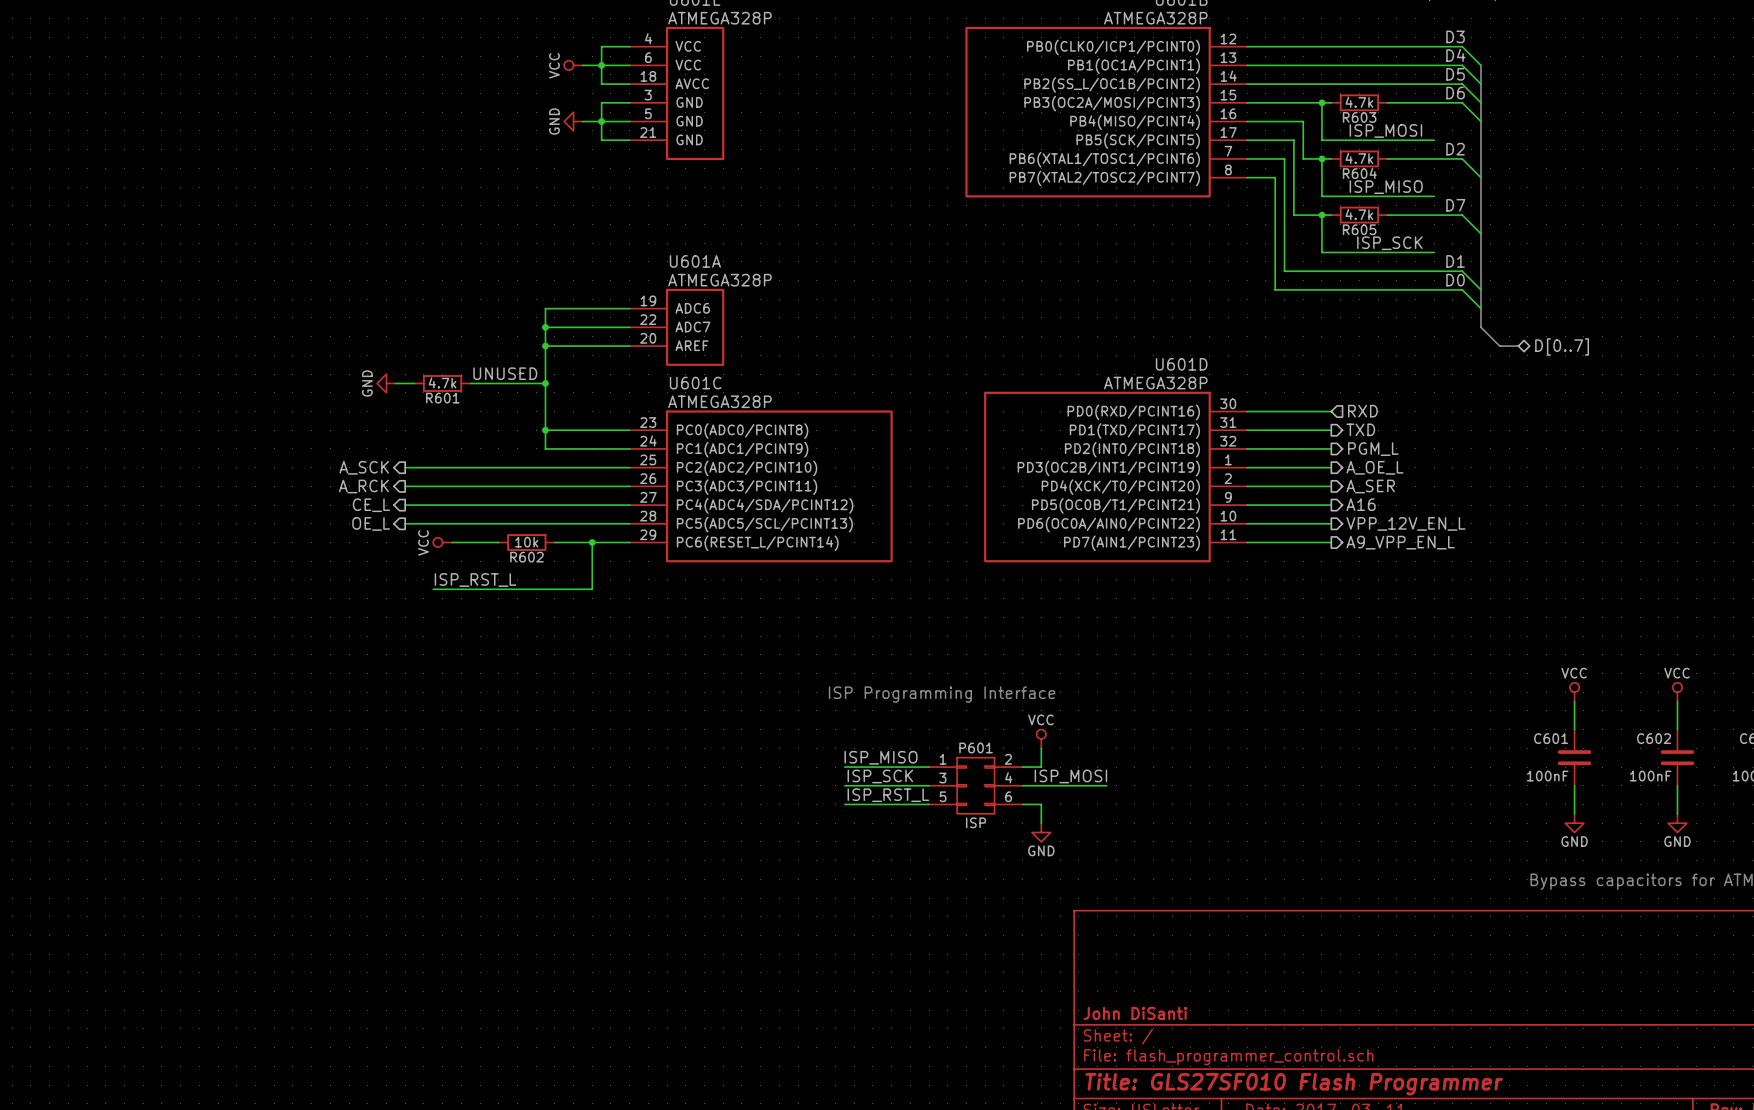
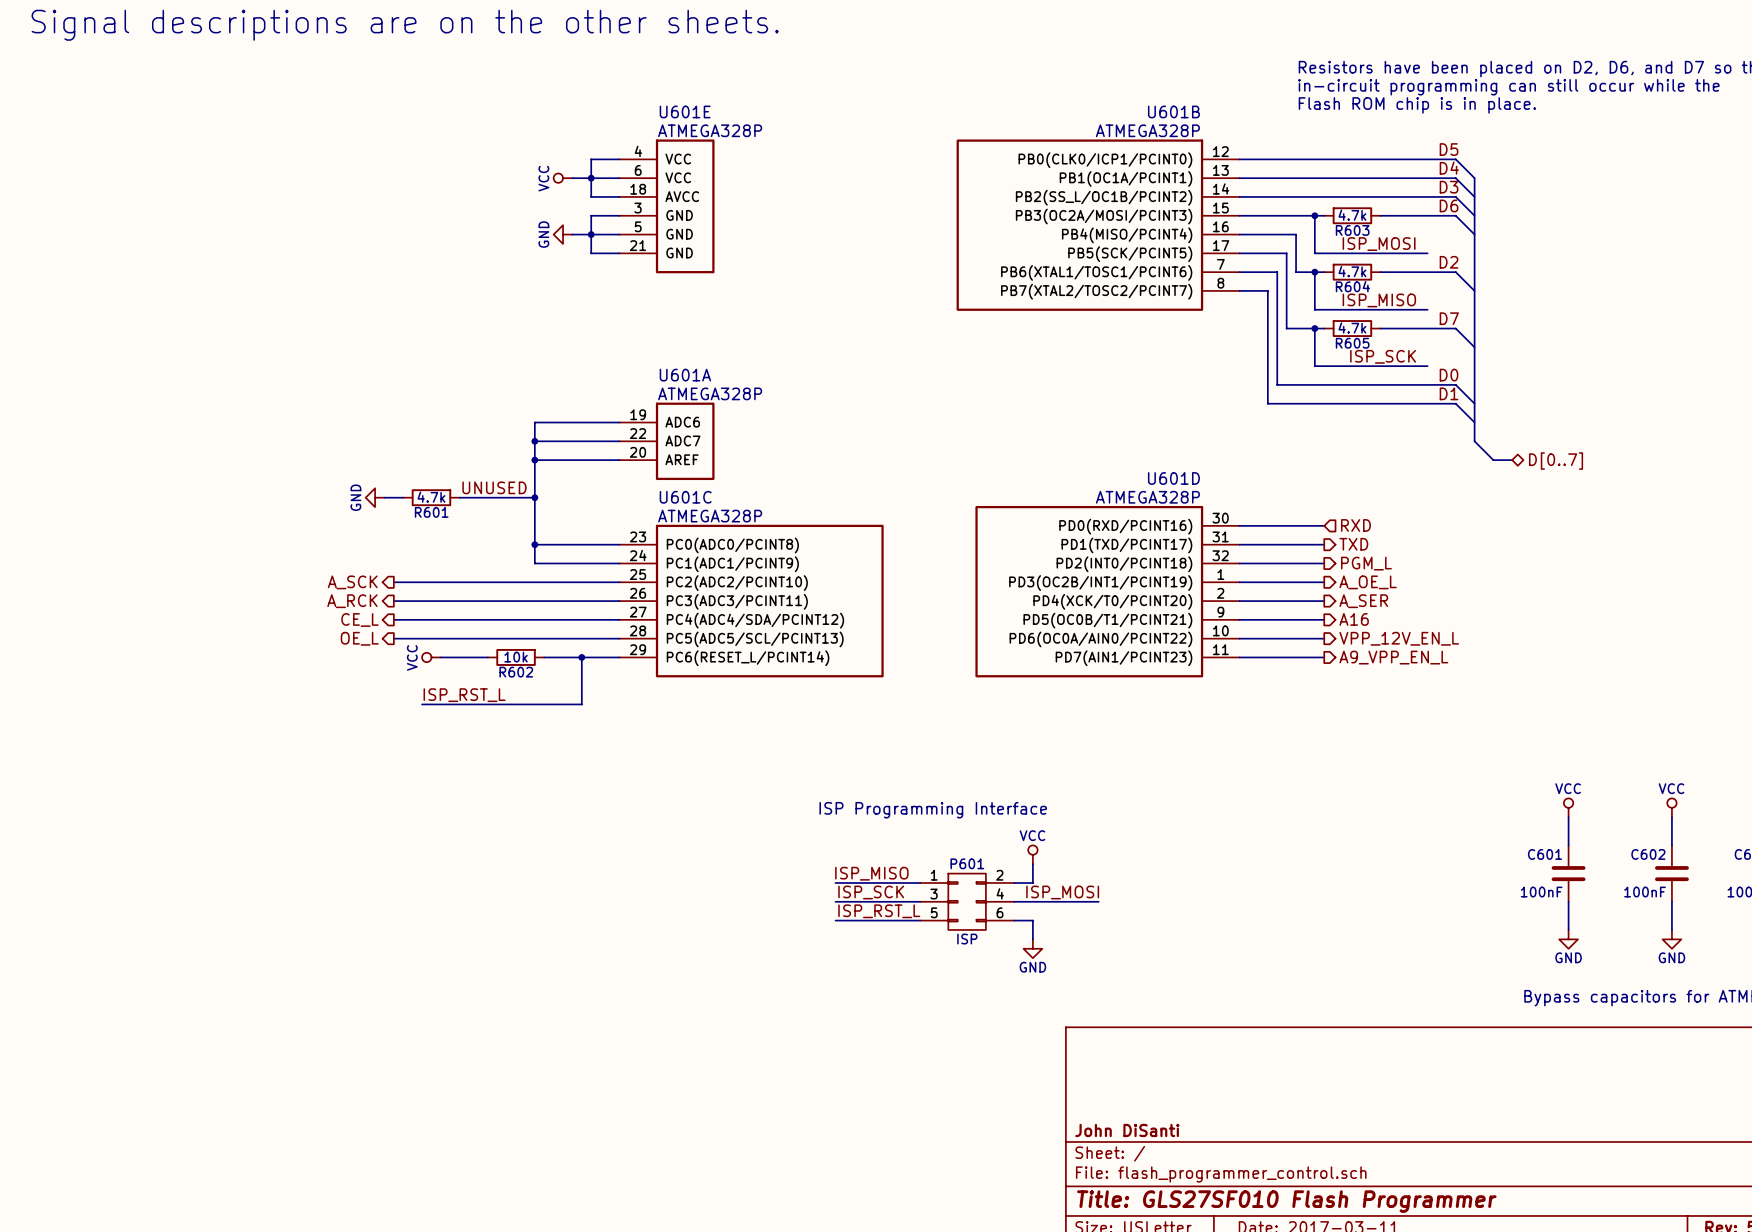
label: D3 (1455, 36) -> D5 (1449, 149)
label: D5 (1455, 74) -> D3 (1449, 187)
label: D1 (1455, 261) -> D0 (1449, 375)
label: D0 (1455, 280) -> D1 (1449, 393)

